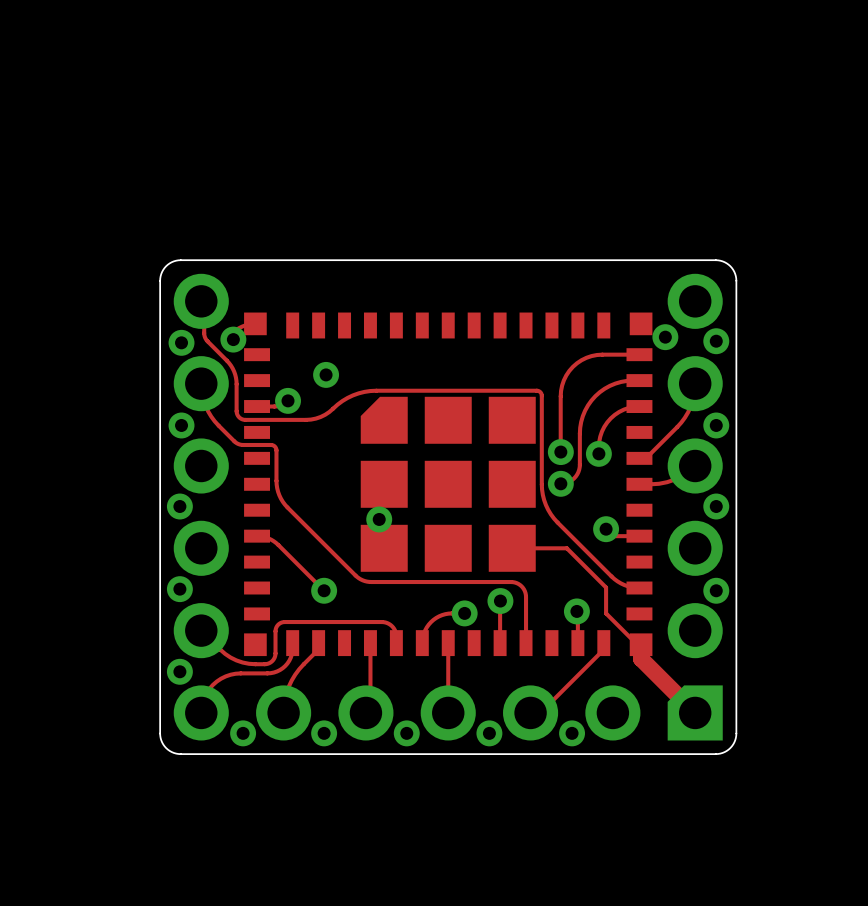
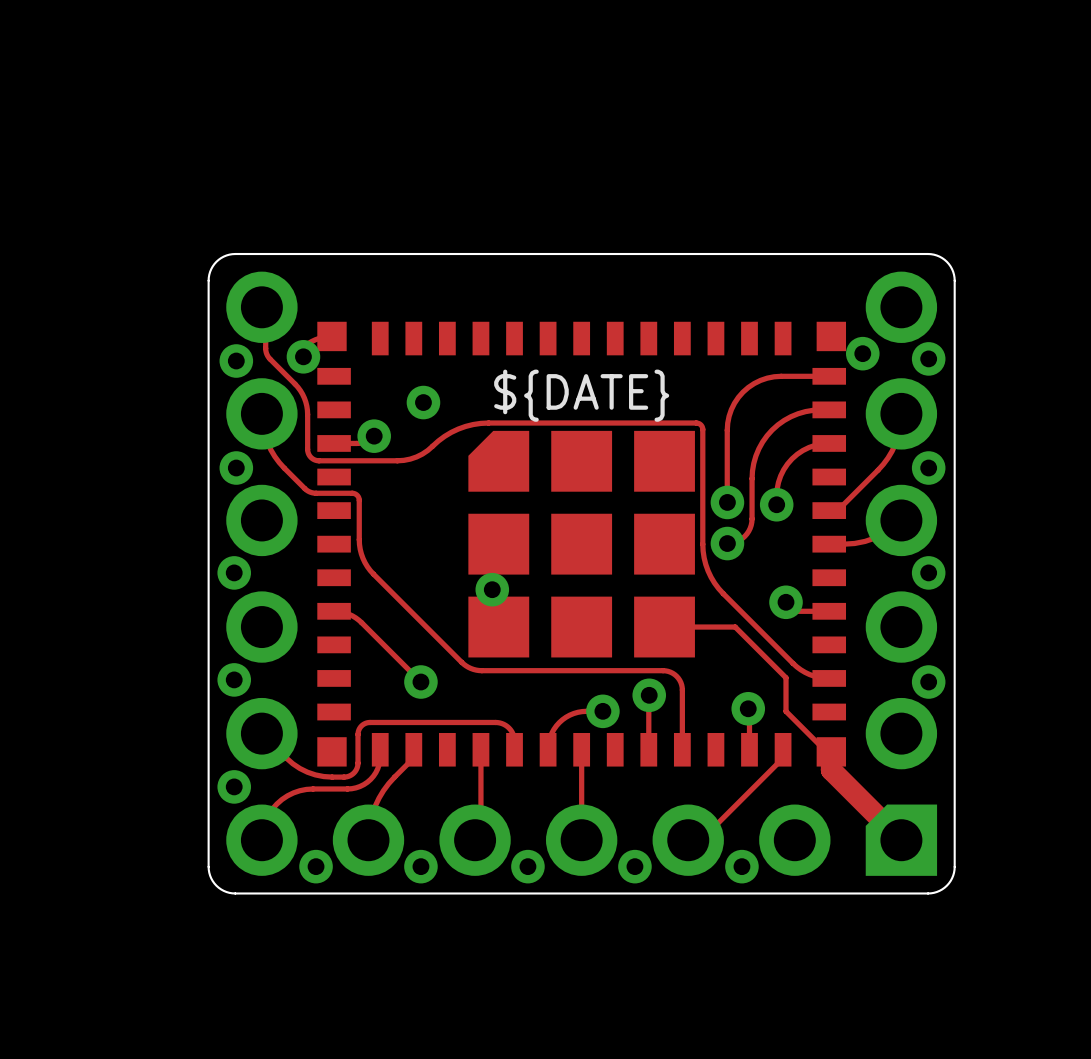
part text: none -> ${DATE} (581, 395)

